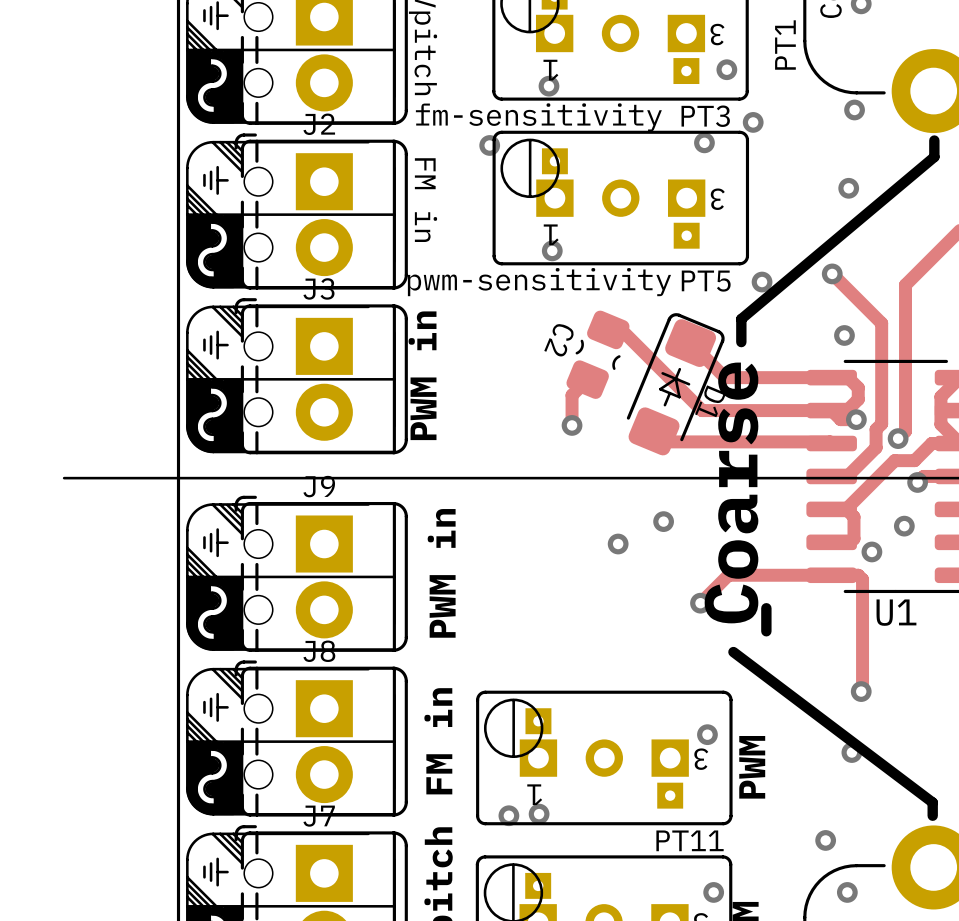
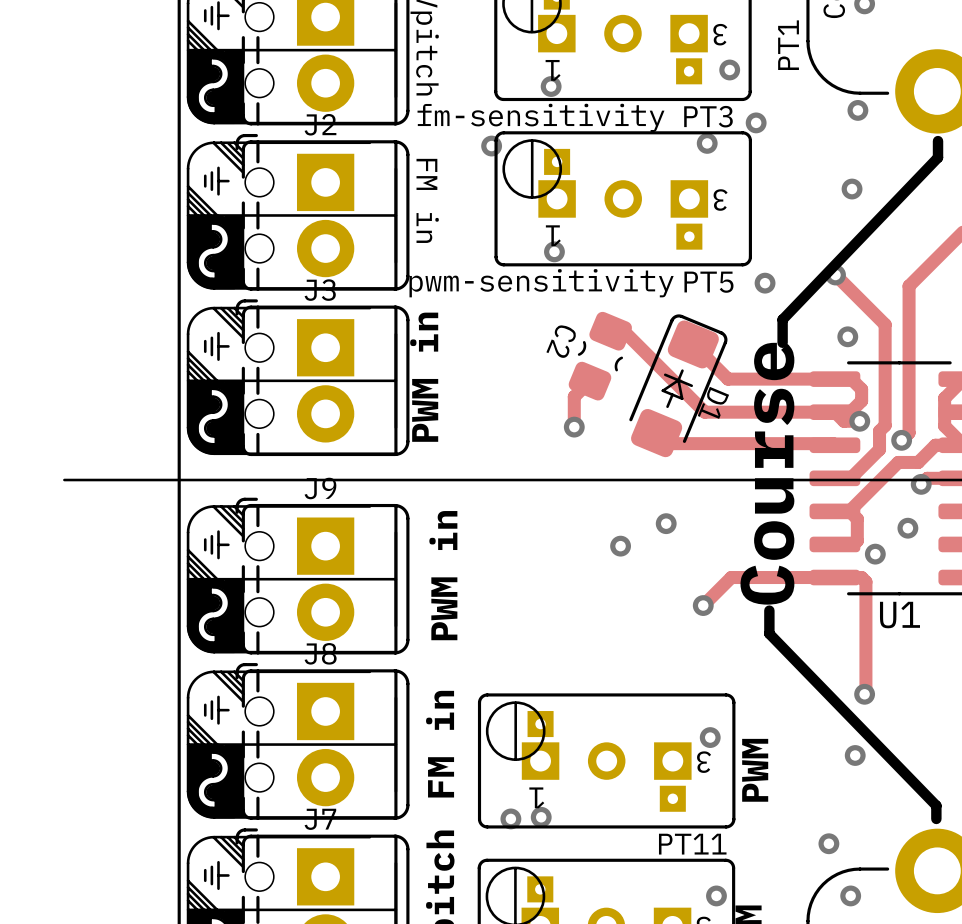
line: (934, 157) (741, 319) (741, 342) -> (938, 157) (782, 319) (782, 342)
text: Coarse (731, 492) -> Course (767, 473)
line: (733, 652) (932, 802) -> (769, 633) (936, 805)

